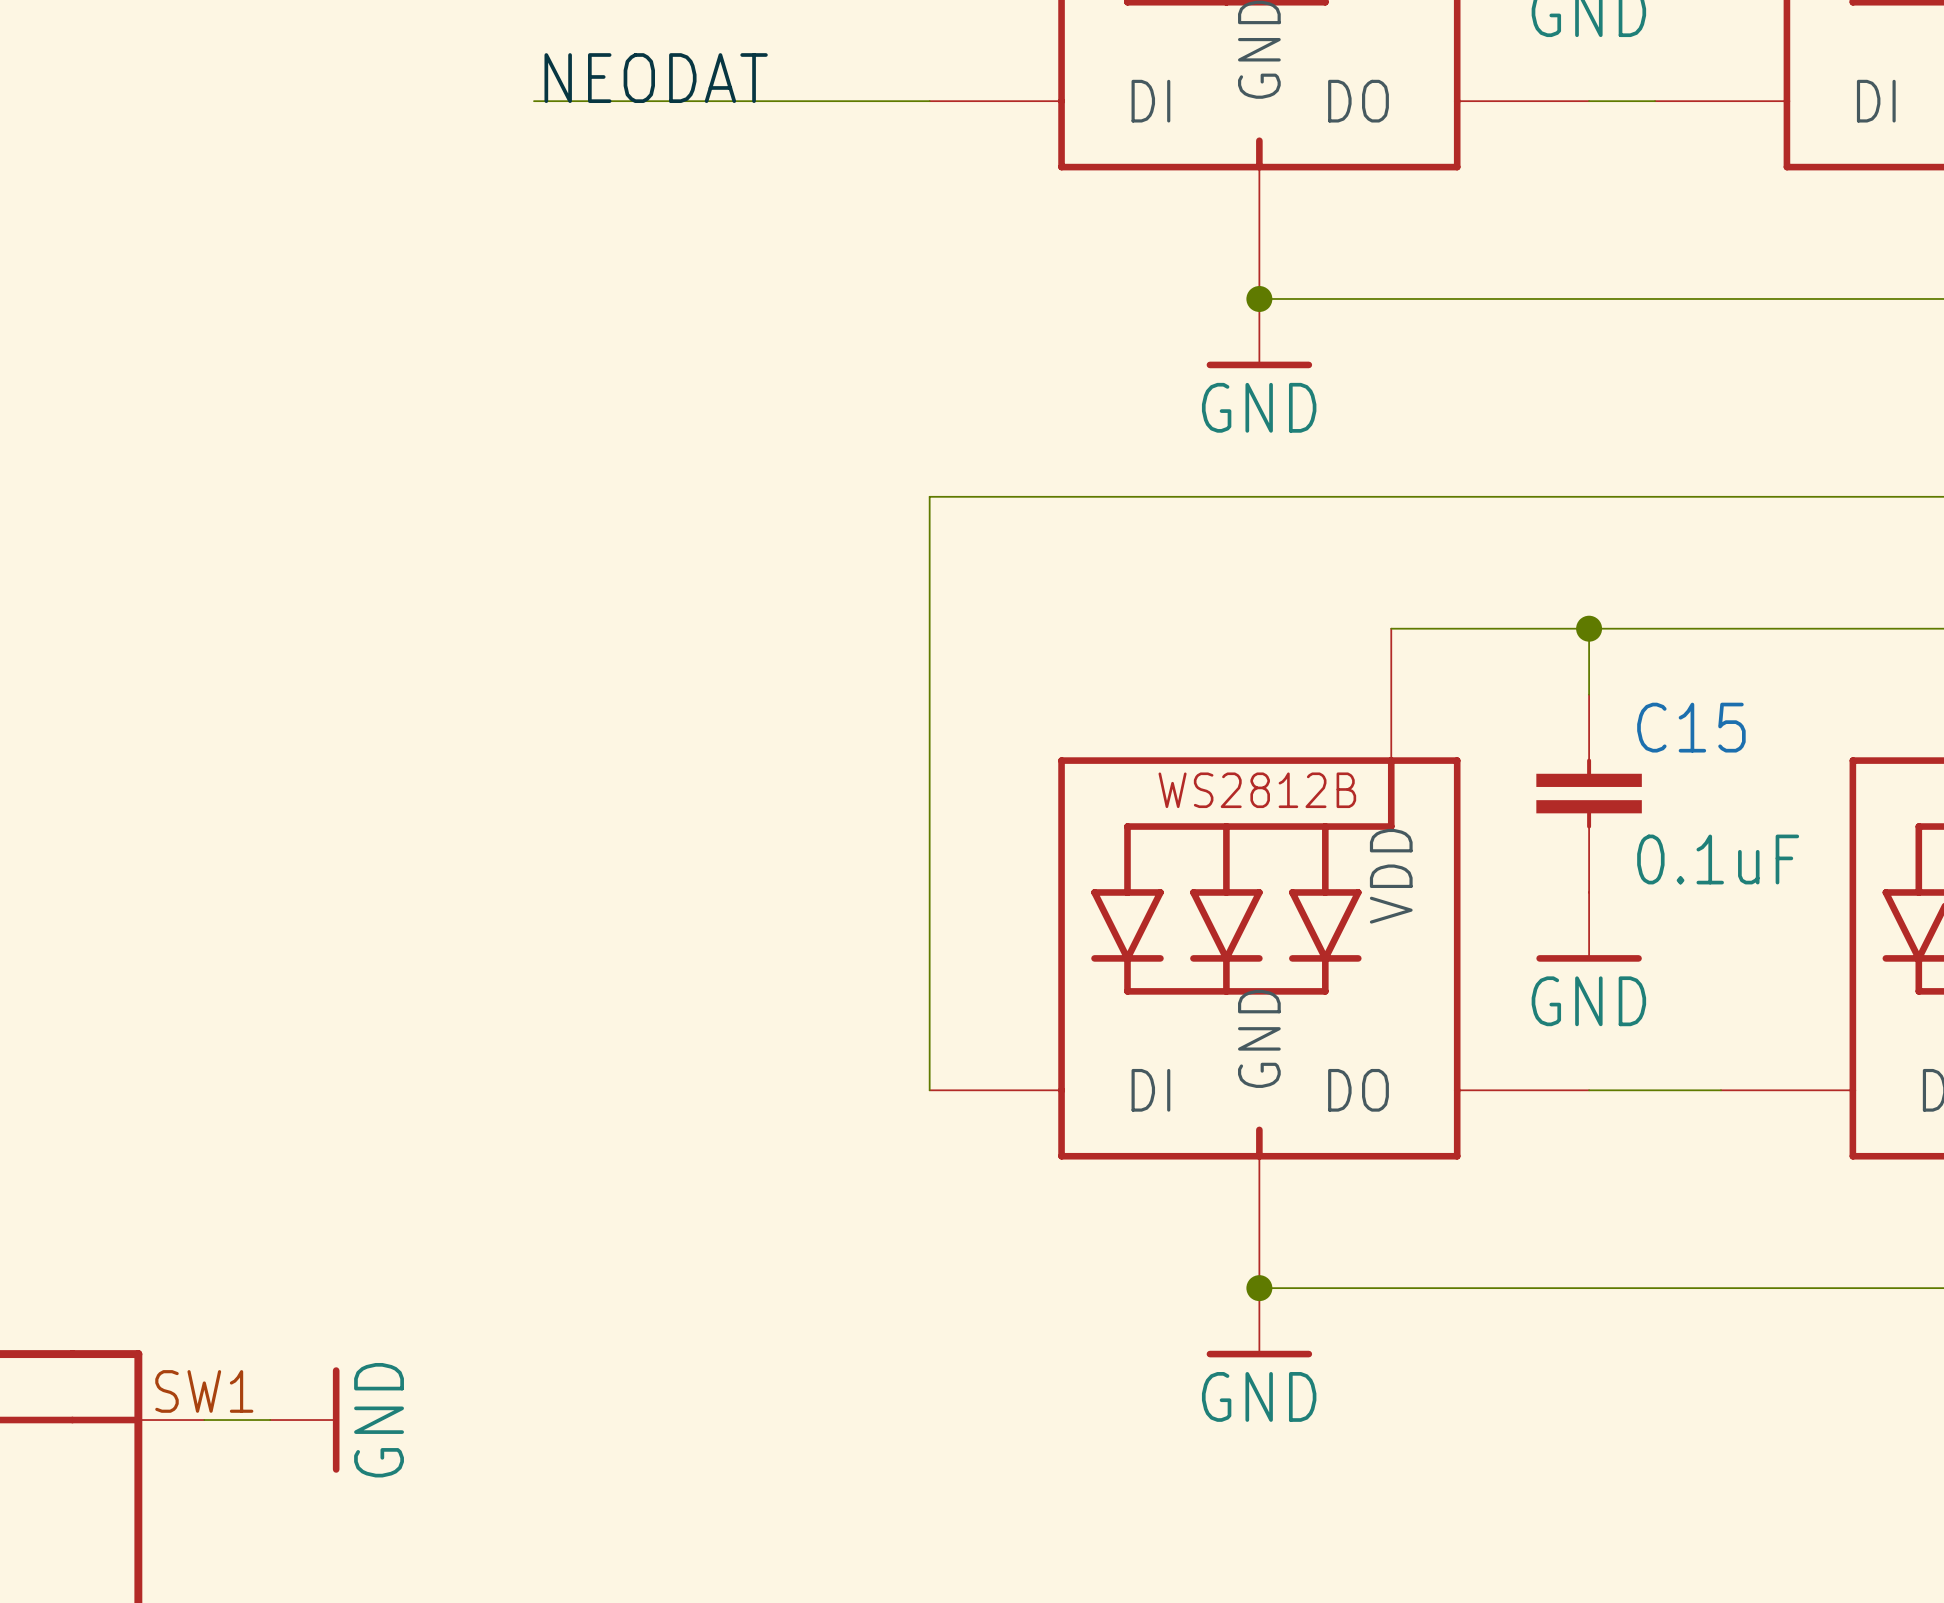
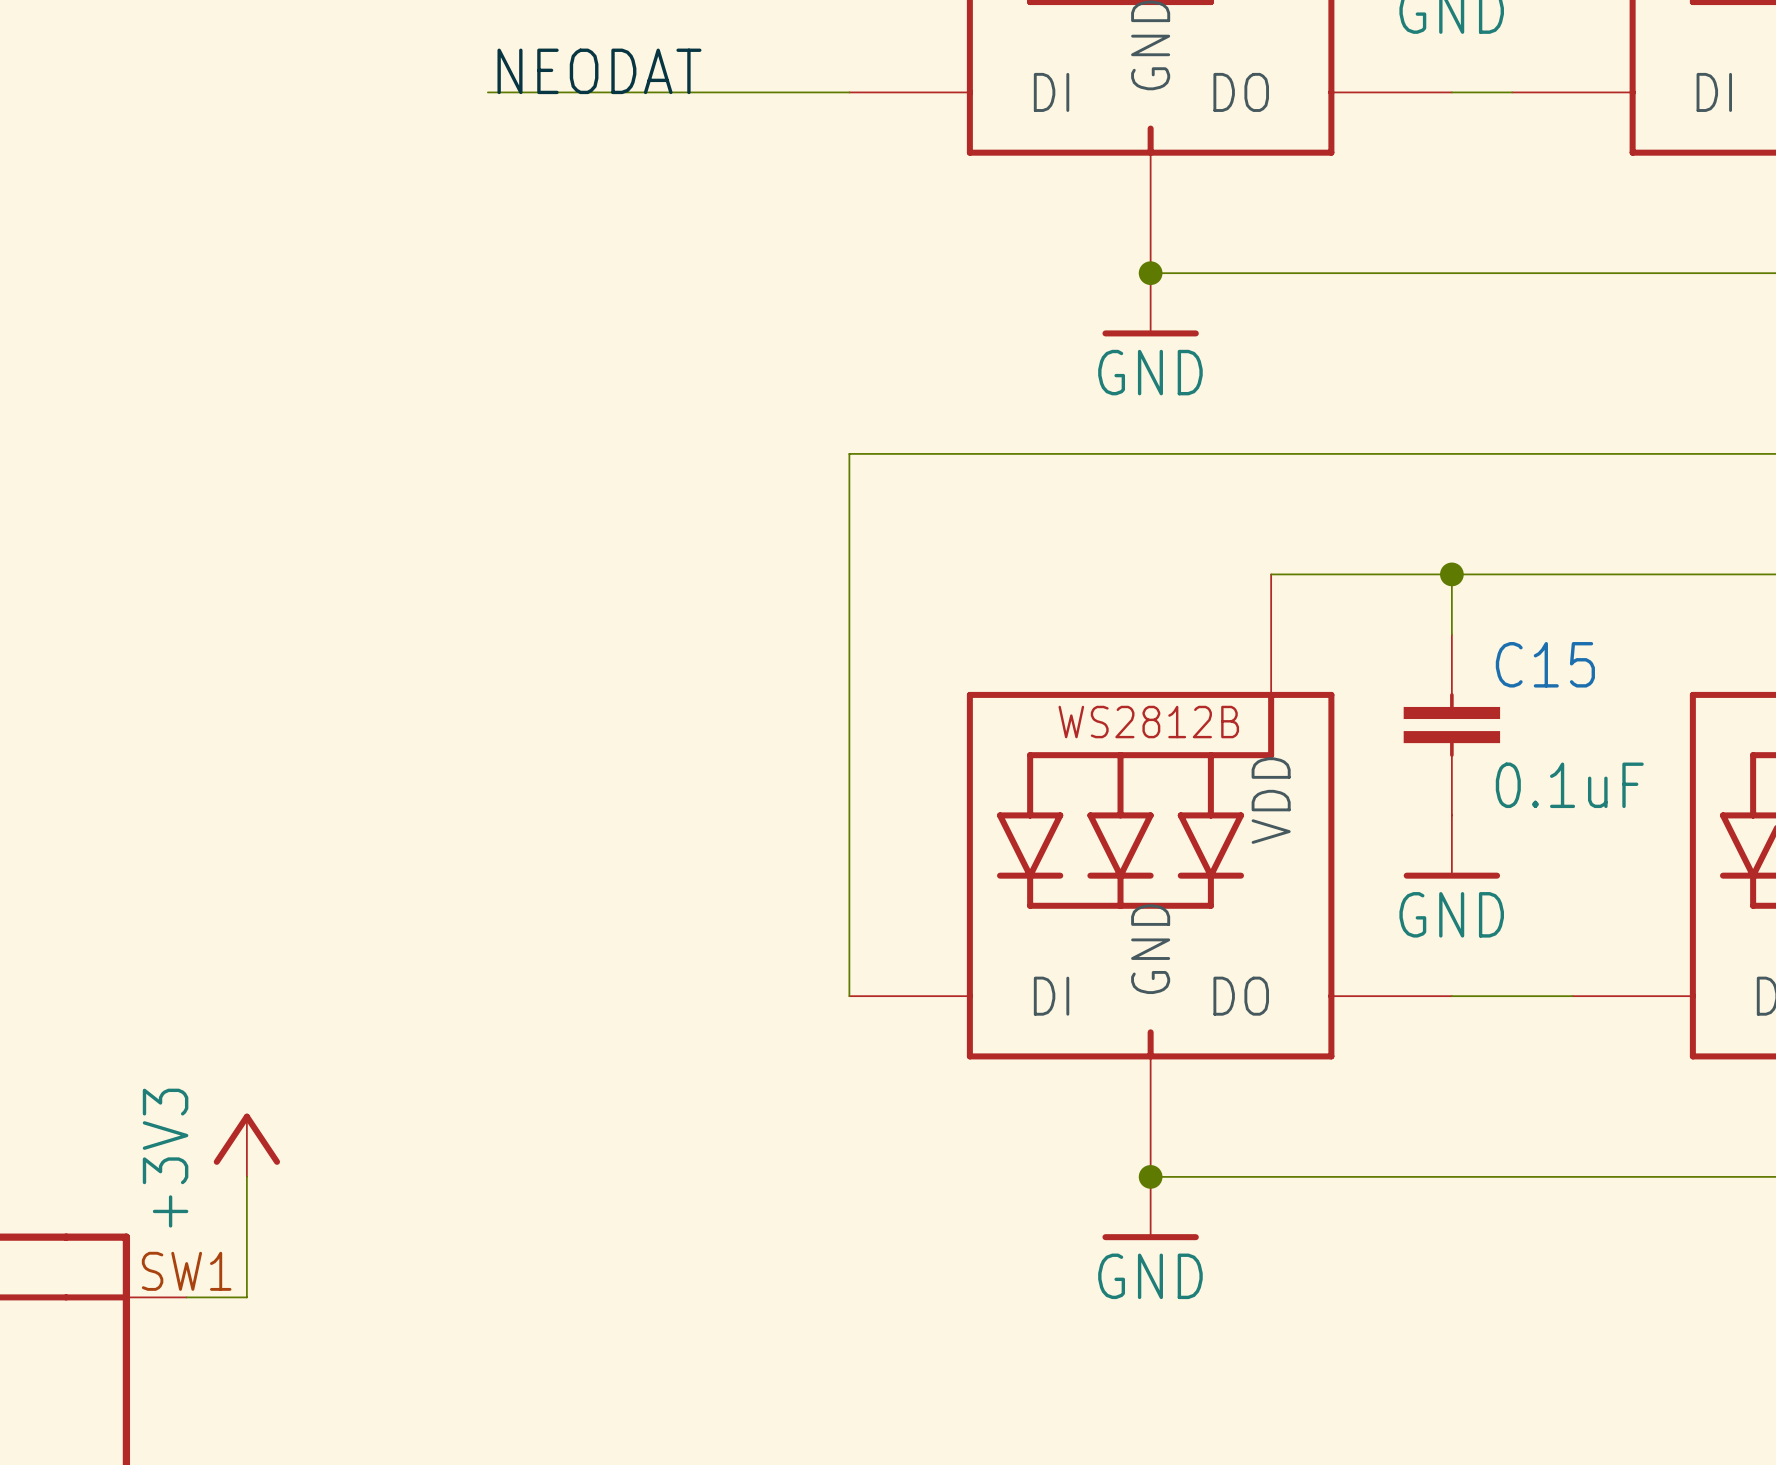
power symbol: none -> +3V3 (246, 1145)
wire: none -> (246, 1176) (246, 1297)
power symbol: GND (304, 1420) -> none

